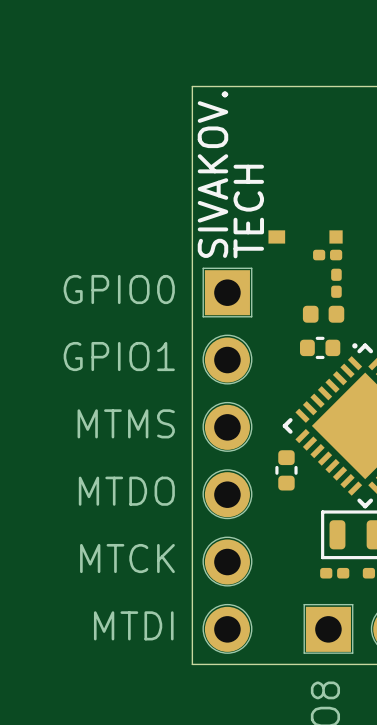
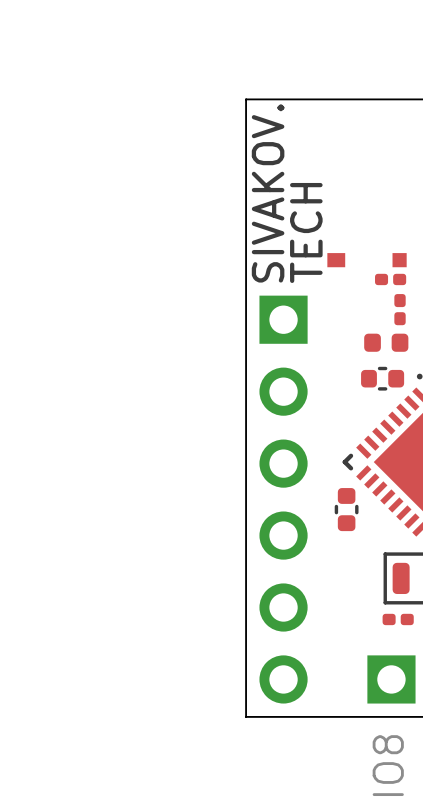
line: (203, 268) (251, 268) (251, 316) (203, 316) (203, 268) -> none
text: GPIO0 (119, 289) -> none
drawing: [202, 334, 253, 654] -> none
text: GPIO1 (119, 356) -> none
text: MTMS (126, 423) -> none
text: MTDO (126, 491) -> none
text: MTCK (127, 558) -> none
line: (304, 604) (352, 604) (352, 653) (304, 653) (304, 604) -> none
text: MTDI (133, 625) -> none

